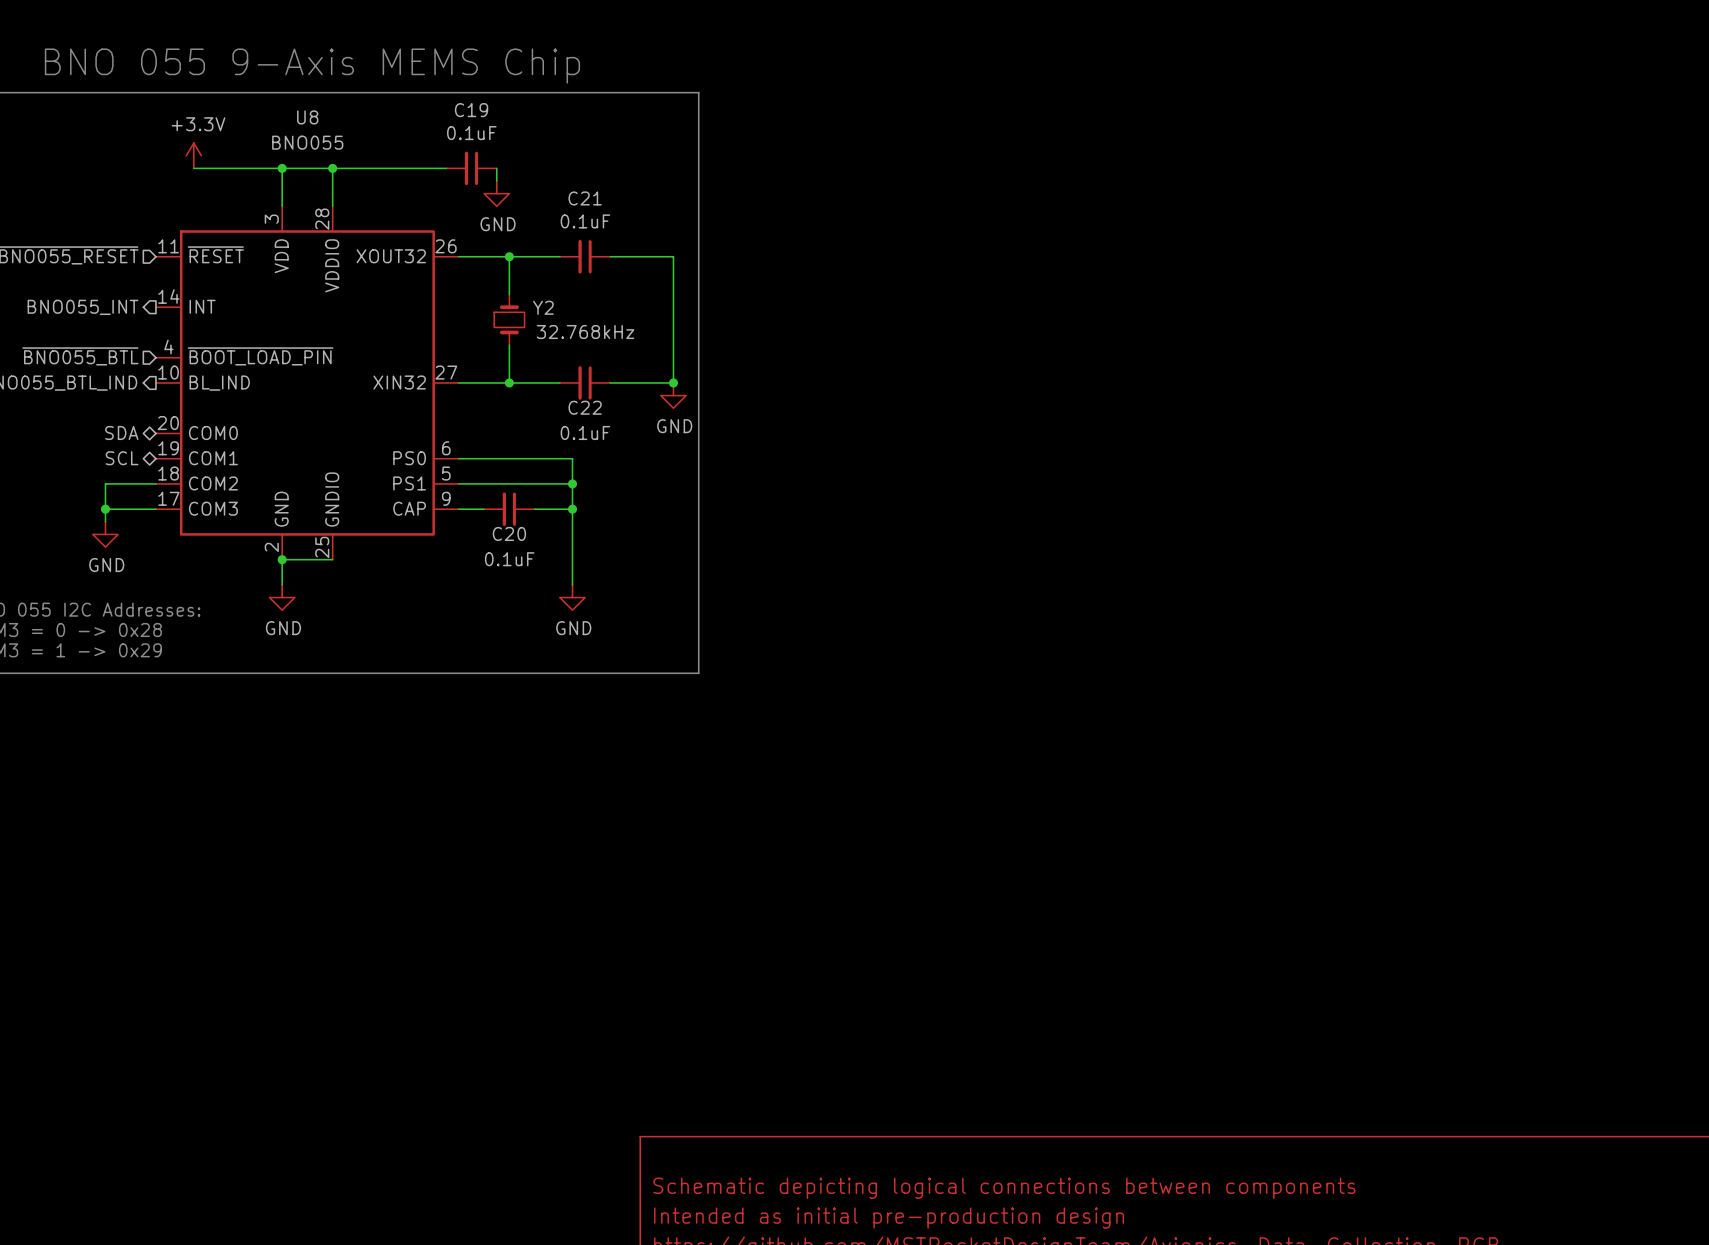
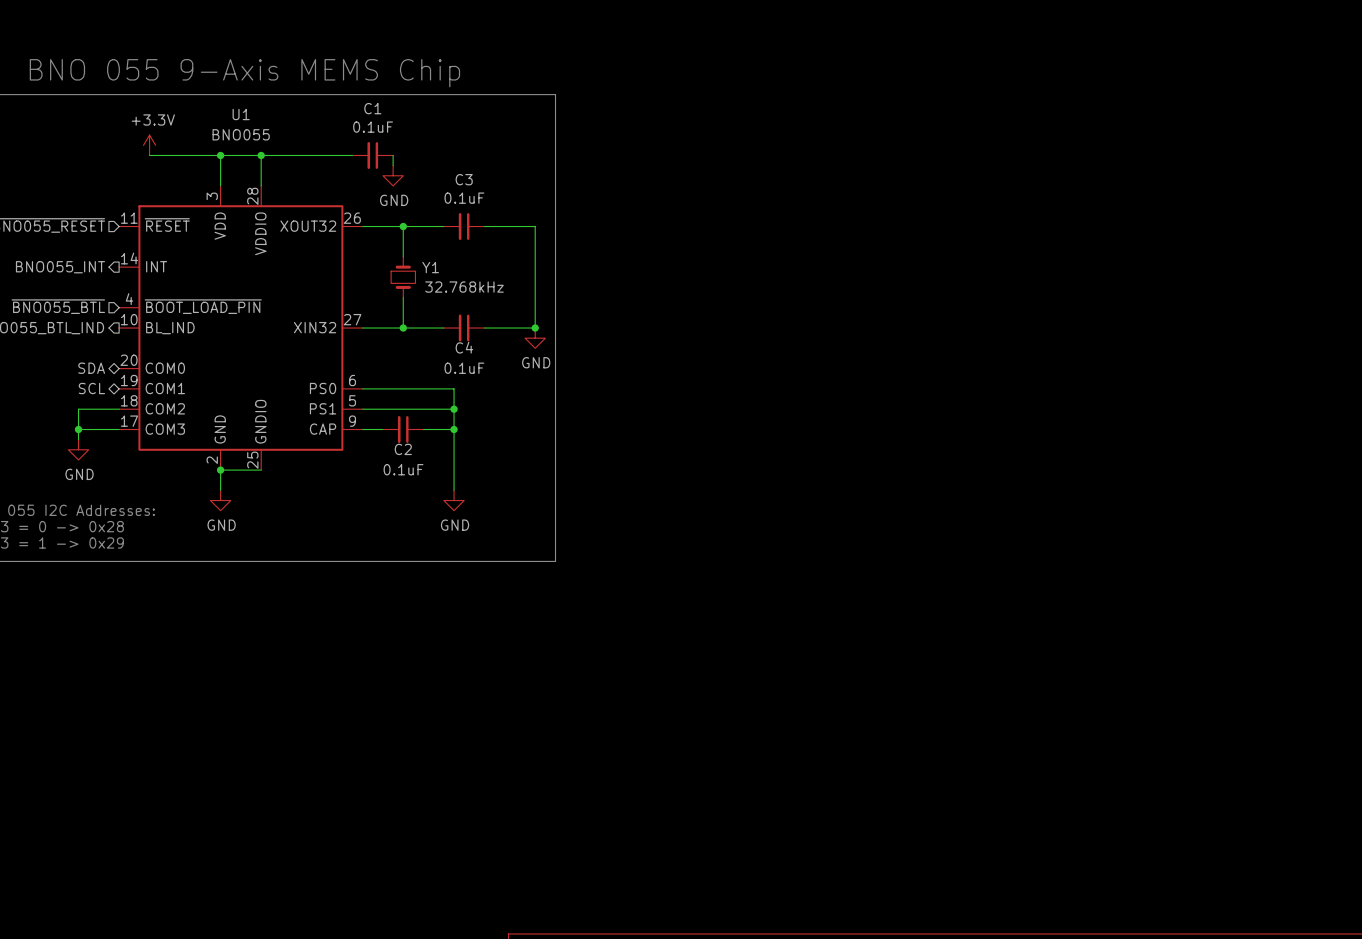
C19 name: C19 (471, 110) -> C1 (372, 108)
U8 name: U8 (307, 117) -> U1 (241, 114)
C21 name: C21 (585, 198) -> C3 (464, 179)
Y2 name: Y2 (543, 307) -> Y1 (430, 267)
C22 name: C22 (585, 407) -> C4 (464, 347)
C20 name: C20 (509, 533) -> C2 (403, 449)

